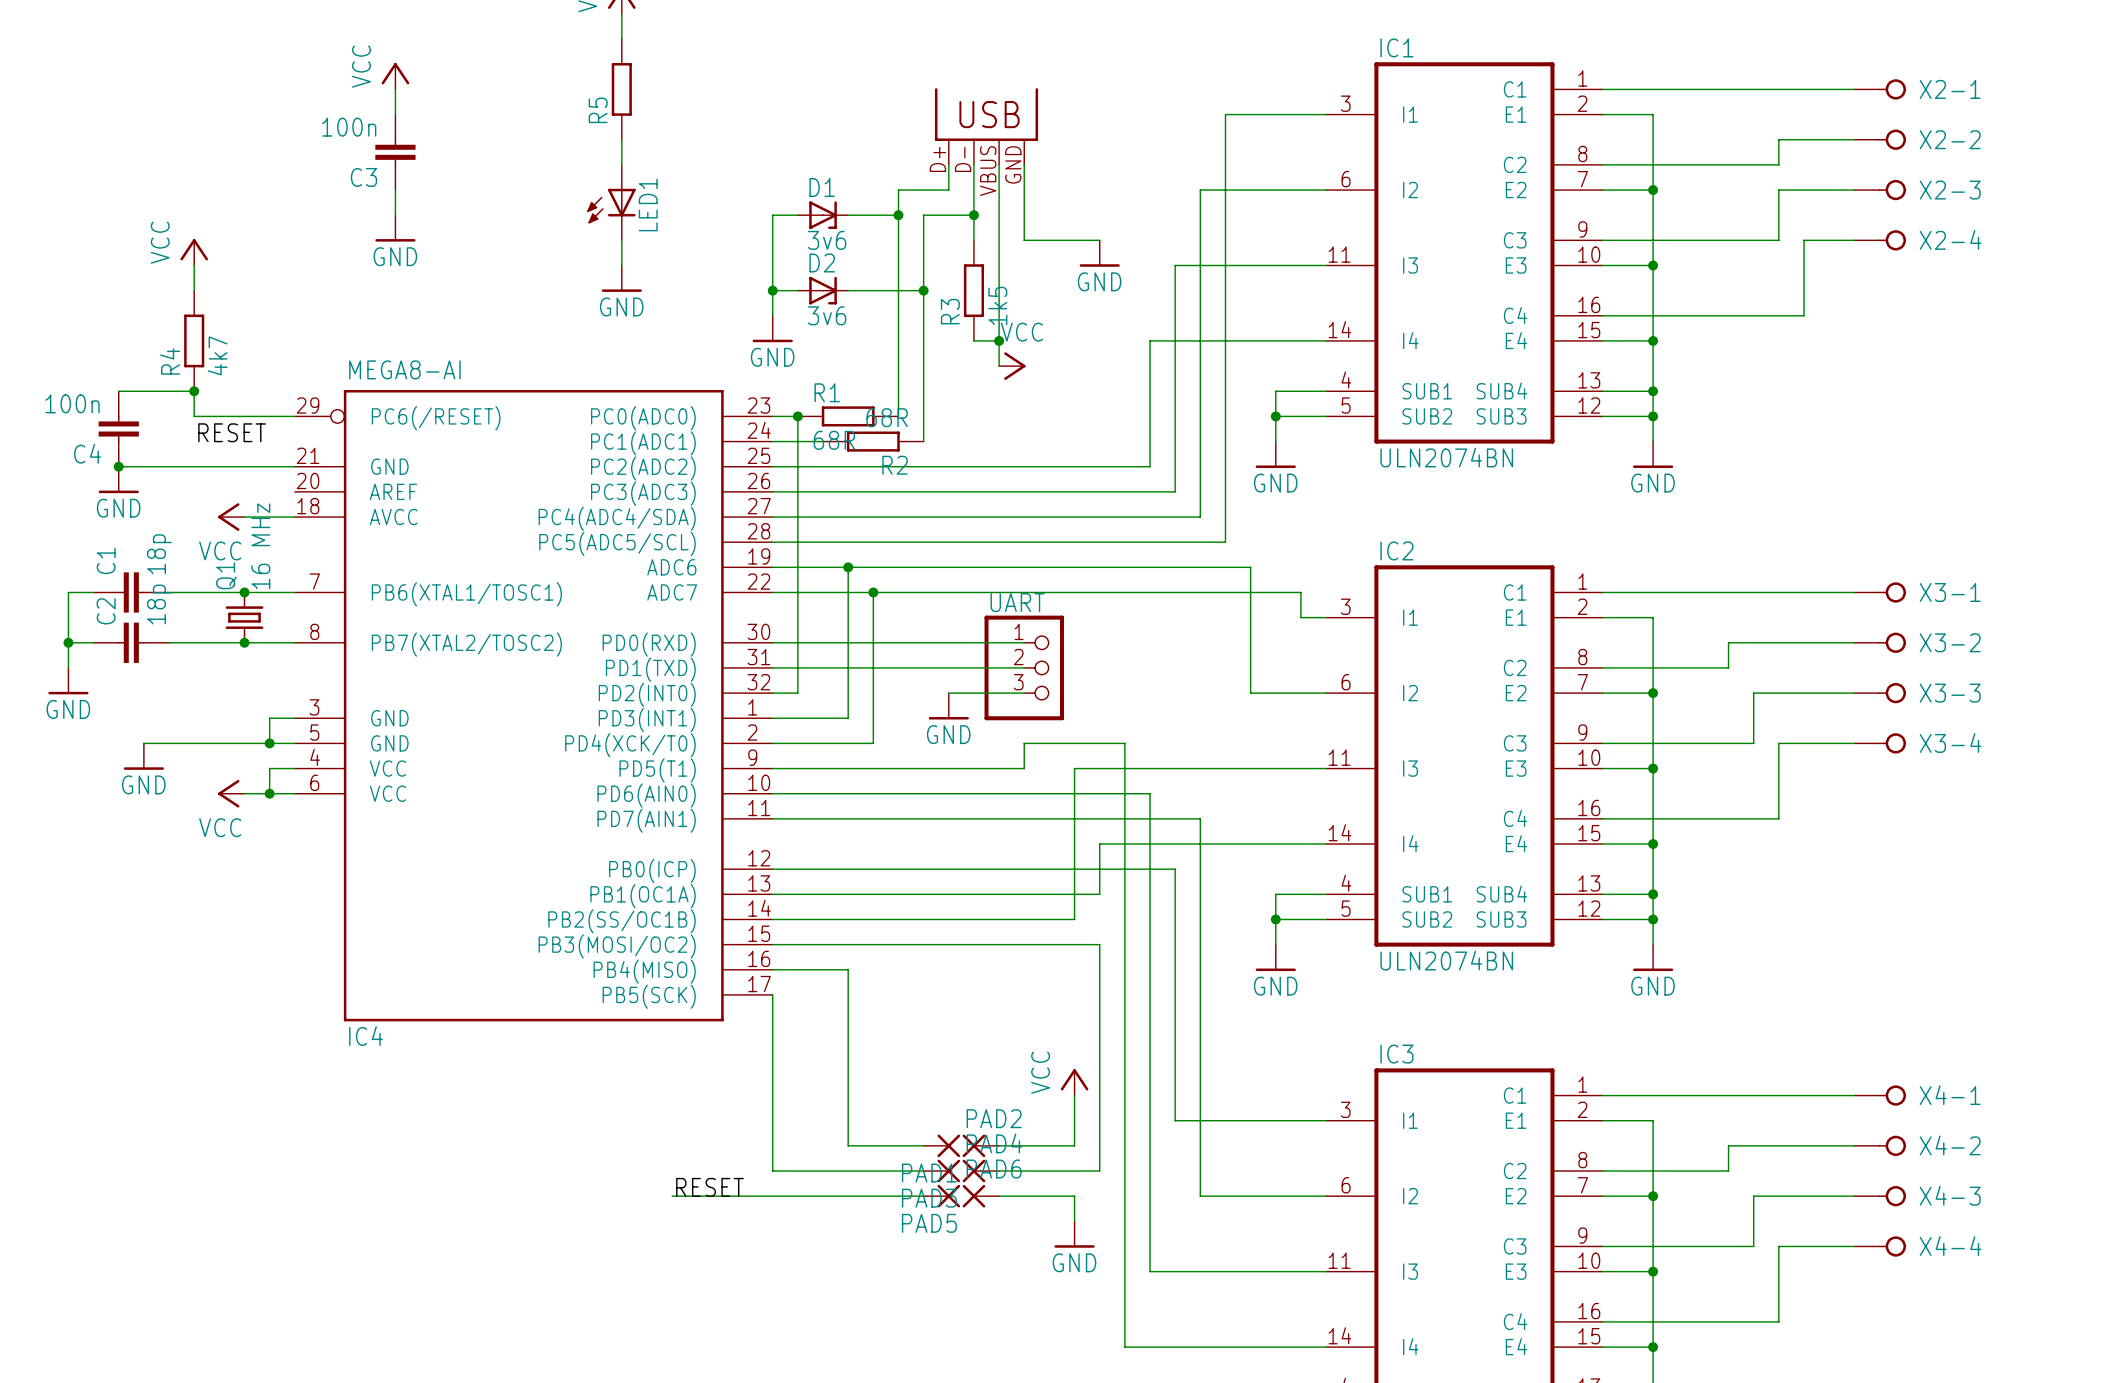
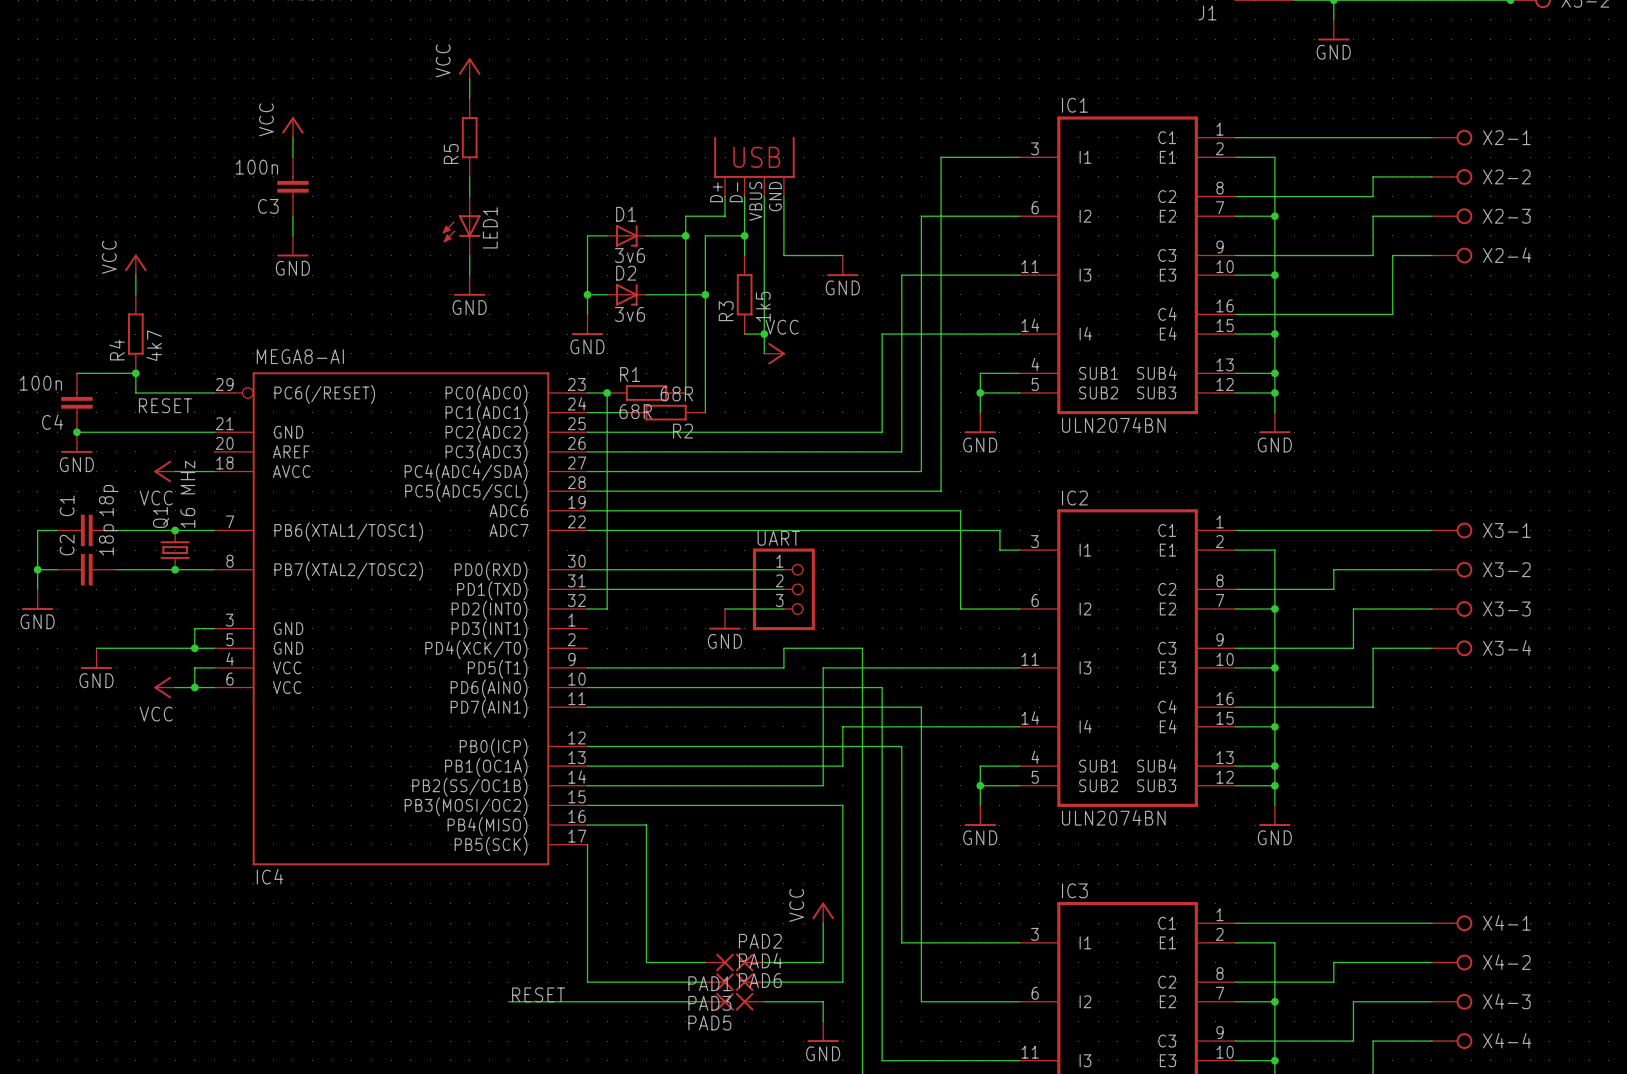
wire: (848, 567) (848, 718) (772, 718) -> none
junction: (848, 567) -> none
wire: (873, 592) (873, 743) (772, 743) -> none
junction: (873, 592) -> none

